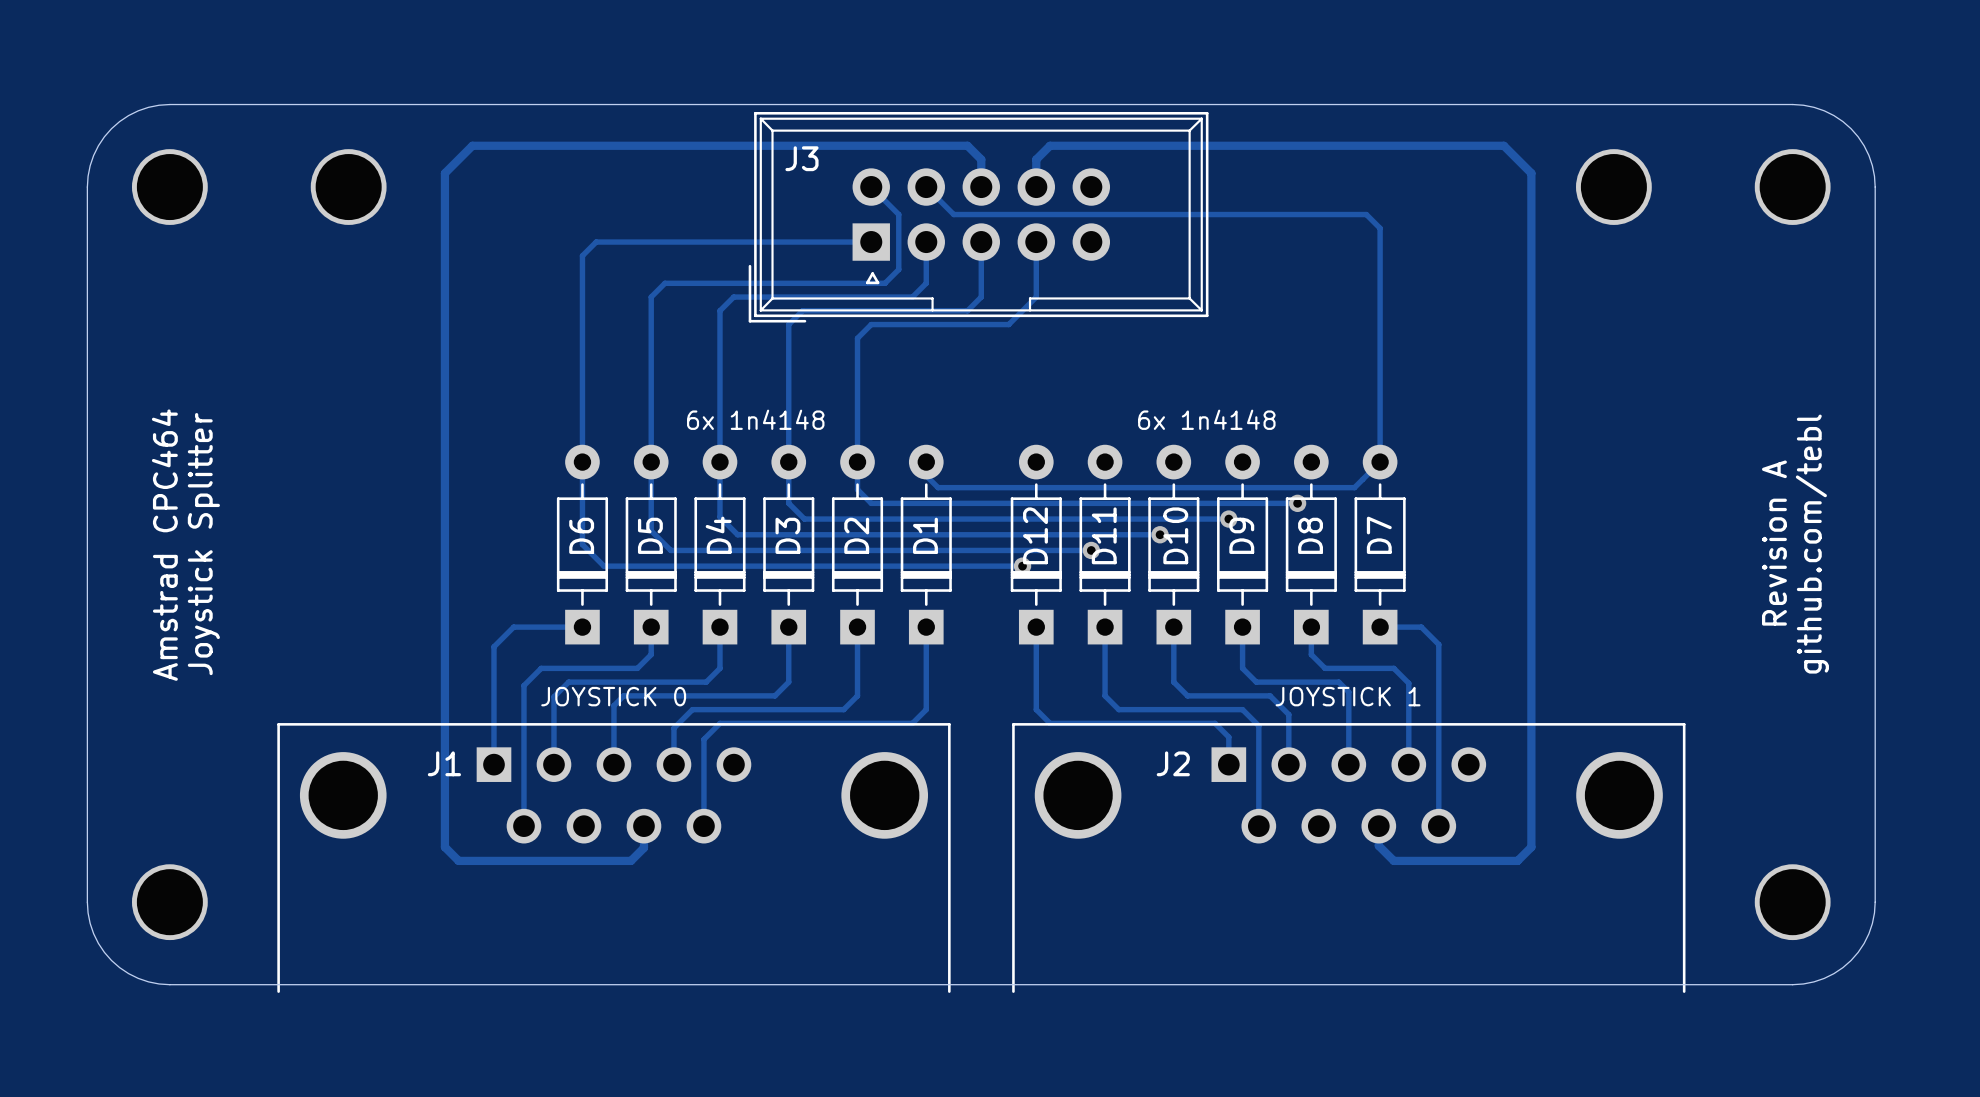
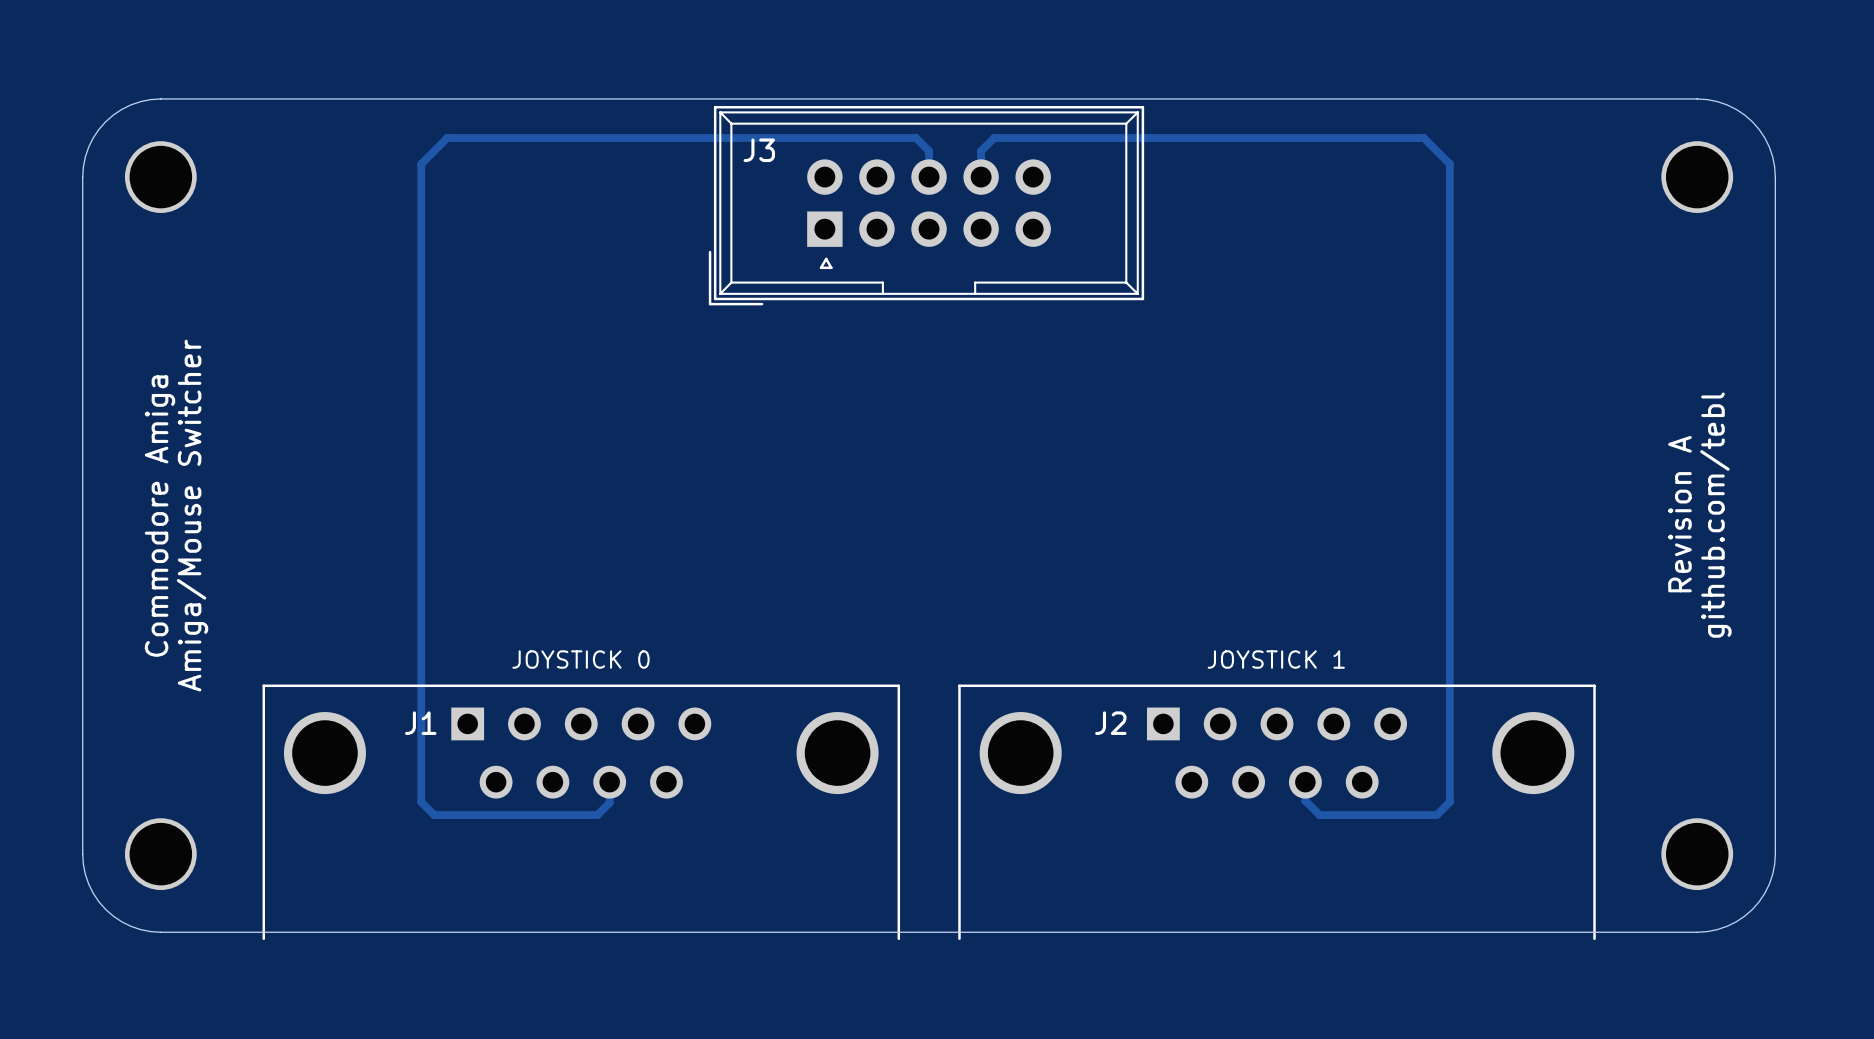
part: (348, 187) -> none
track: (871, 187) (898, 214) (898, 269) (885, 283) (664, 283) (651, 297) (651, 530) (670, 550) (1091, 550) -> none
track: (926, 187) (953, 214) (1366, 214) (1380, 228) (1380, 462) (1354, 487) (938, 487) (926, 475) (926, 462) -> none
part: (1613, 187) -> none
track: (871, 242) (596, 242) (582, 255) (582, 544) (604, 566) (1022, 566) -> none
track: (926, 242) (926, 283) (912, 297) (733, 297) (719, 310) (719, 517) (737, 534) (1160, 534) -> none
track: (981, 242) (981, 297) (967, 310) (802, 310) (788, 324) (788, 503) (804, 519) (1228, 519) -> none
track: (1036, 242) (1036, 297) (1008, 324) (871, 324) (857, 338) (857, 489) (871, 503) (1297, 503) -> none
text: 6x 1n4148 (755, 419) -> none
text: 6x 1n4148 (1206, 419) -> none
via: (1297, 503) -> none
via: (1228, 519) -> none
via: (1160, 534) -> none
text: Joystick Splitter (203, 544) -> Amiga/Mouse Switcher (192, 515)
D6: (582, 544) -> none
D5: (651, 544) -> none
D4: (719, 544) -> none
D3: (788, 544) -> none
D2: (857, 544) -> none
D1: (926, 544) -> none
D12: (1036, 544) -> none
D11: (1105, 544) -> none
D10: (1173, 544) -> none
D9: (1242, 544) -> none
D8: (1311, 544) -> none
D7: (1380, 544) -> none
text: Amstrad CPC464 (164, 545) -> Commodore Amiga (160, 516)
via: (1091, 550) -> none
via: (1022, 566) -> none
track: (582, 627) (513, 627) (493, 646) (493, 764) -> none
track: (651, 627) (651, 654) (637, 668) (541, 668) (523, 685) (523, 826) -> none
track: (719, 627) (719, 668) (706, 682) (568, 682) (553, 696) (553, 764) -> none
track: (788, 627) (788, 682) (774, 695) (623, 695) (613, 705) (613, 764) -> none
track: (857, 627) (857, 695) (843, 709) (692, 709) (673, 728) (673, 764) -> none
track: (926, 627) (926, 709) (912, 723) (719, 723) (703, 739) (703, 826) -> none
track: (1036, 627) (1036, 709) (1050, 723) (1215, 723) (1228, 737) (1228, 764) -> none
track: (1105, 627) (1105, 695) (1118, 709) (1242, 709) (1258, 725) (1258, 826) -> none
track: (1173, 627) (1173, 682) (1187, 695) (1270, 695) (1288, 714) (1288, 764) -> none
track: (1242, 627) (1242, 668) (1256, 682) (1338, 682) (1348, 692) (1348, 764) -> none
track: (1311, 627) (1311, 654) (1325, 668) (1393, 668) (1408, 683) (1408, 764) -> none
track: (1380, 627) (1421, 627) (1438, 644) (1438, 826) -> none

